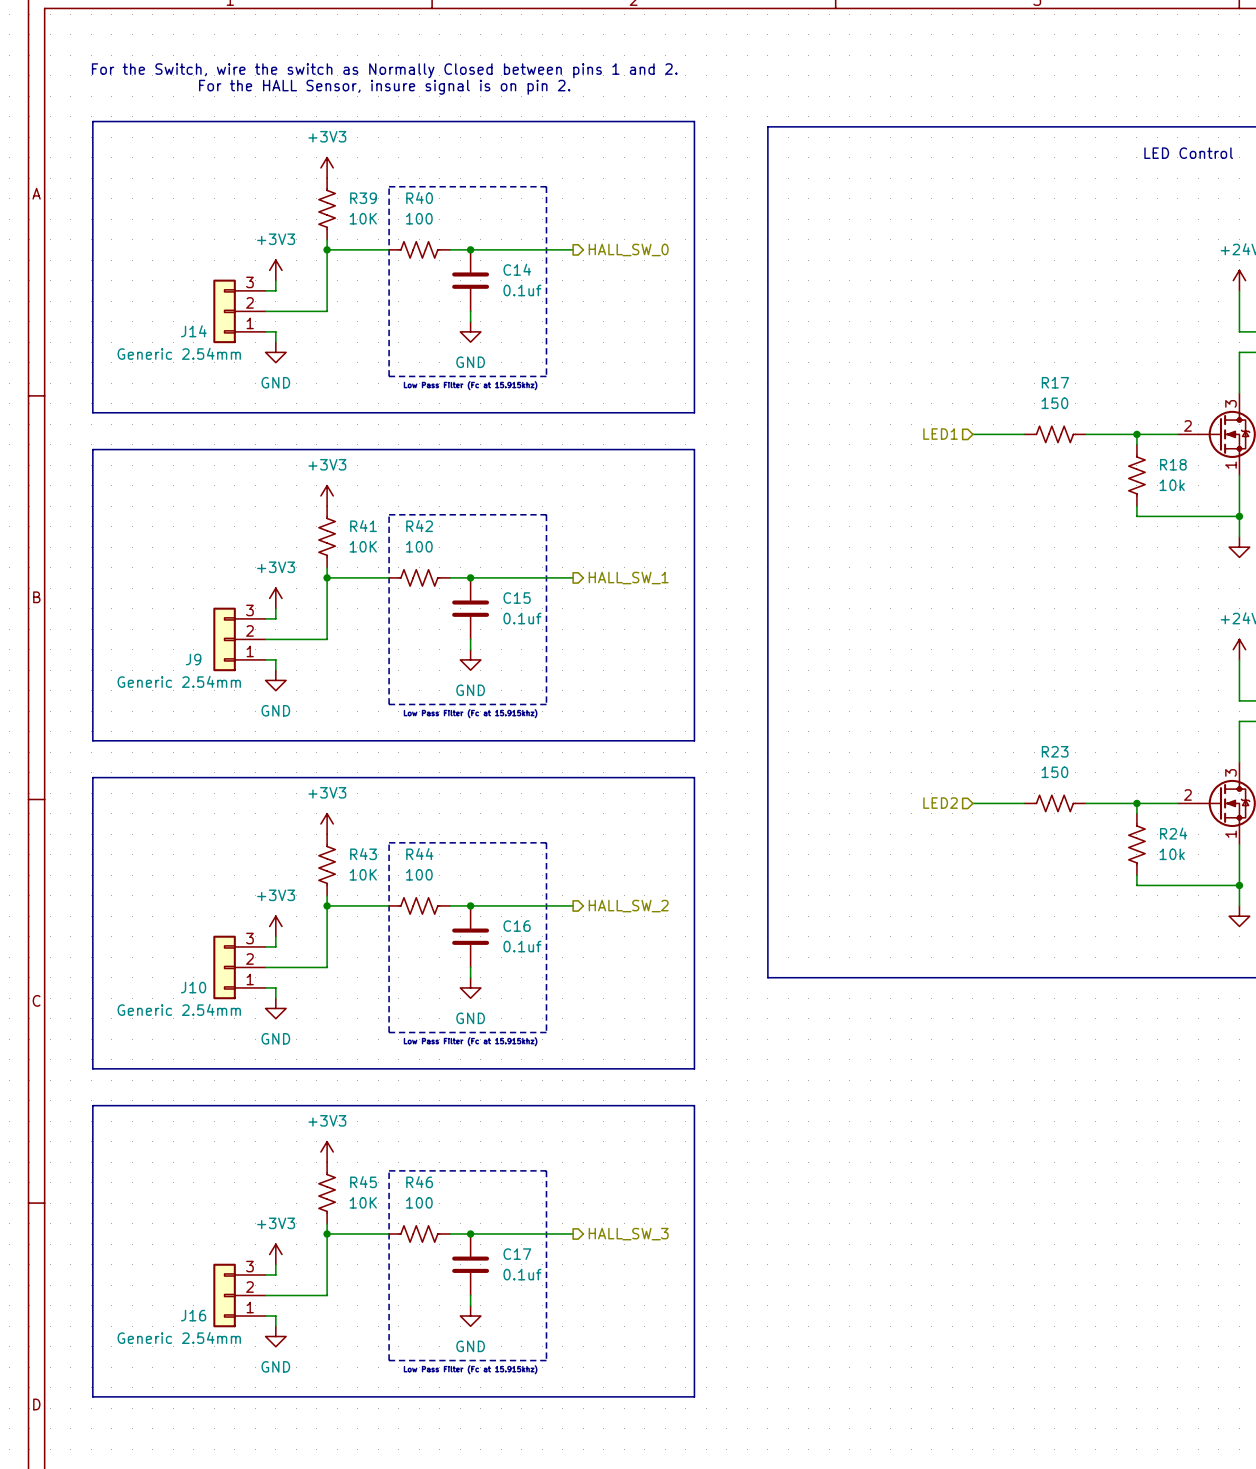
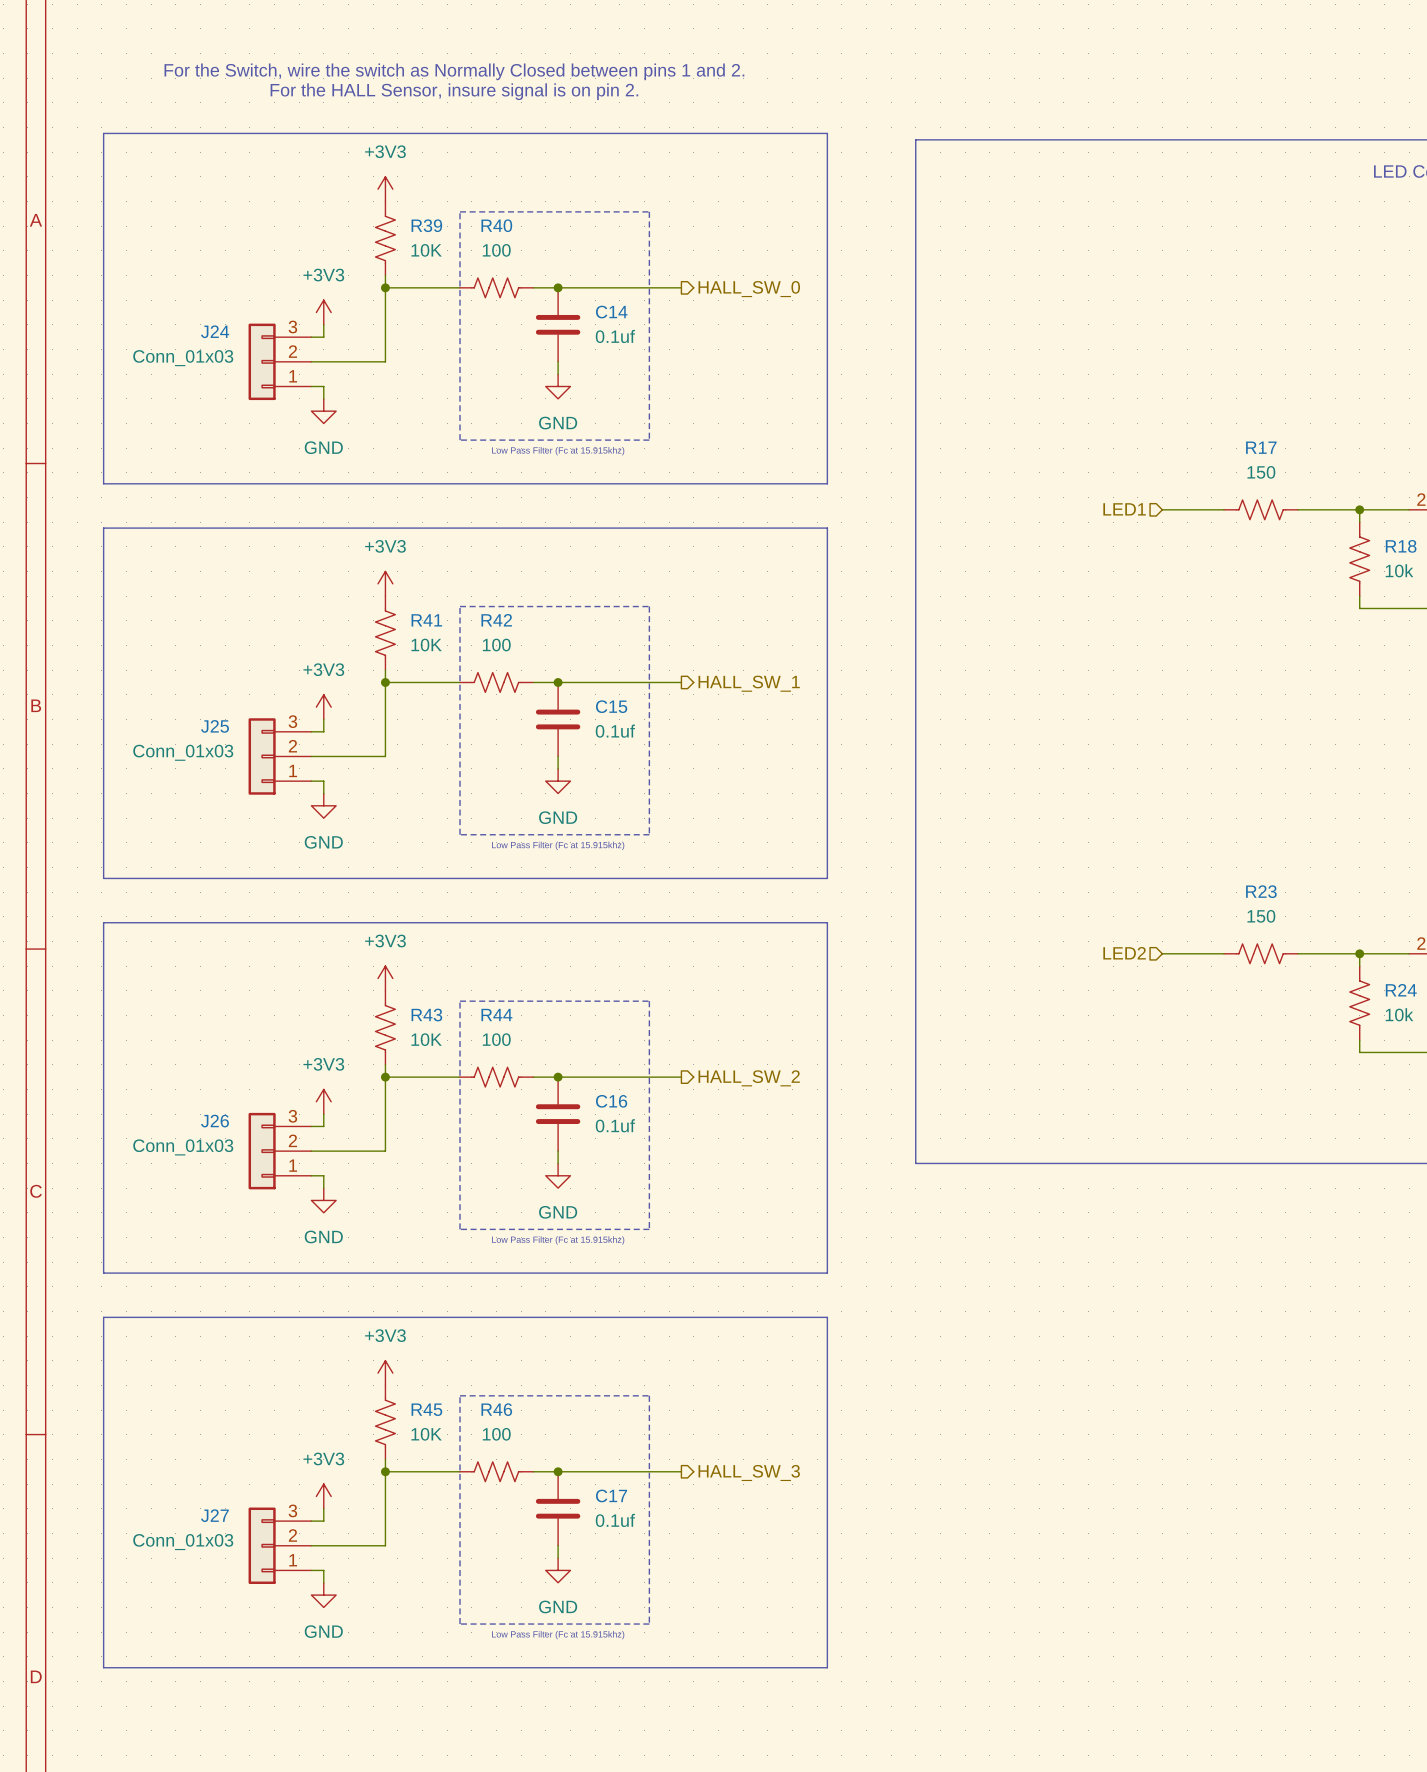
J14 name: J14 (193, 331) -> J24 (215, 331)
J14 value: Generic 2.54mm (179, 353) -> Conn_01x03 (183, 358)
J9 name: J9 (193, 659) -> J25 (215, 726)
J9 value: Generic 2.54mm (179, 681) -> Conn_01x03 (183, 752)
J10 name: J10 (193, 987) -> J26 (214, 1121)
J10 value: Generic 2.54mm (179, 1009) -> Conn_01x03 (183, 1147)
J16 name: J16 (193, 1315) -> J27 (214, 1515)
J16 value: Generic 2.54mm (179, 1337) -> Conn_01x03 (183, 1542)

